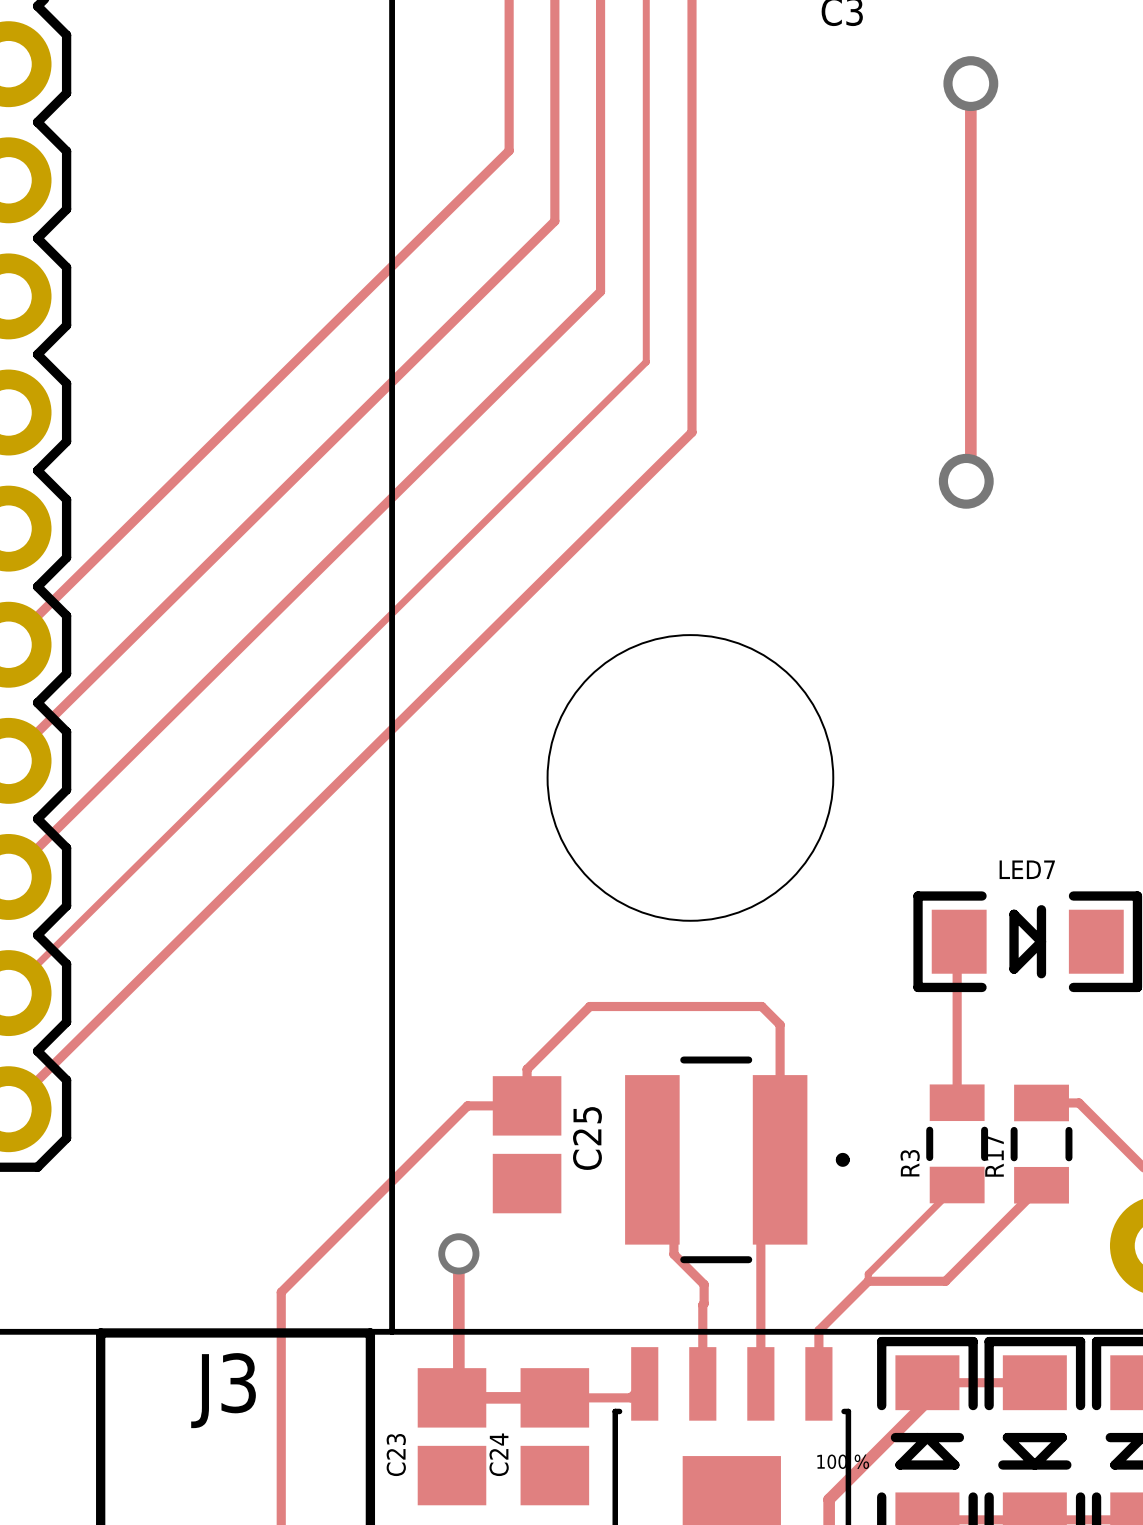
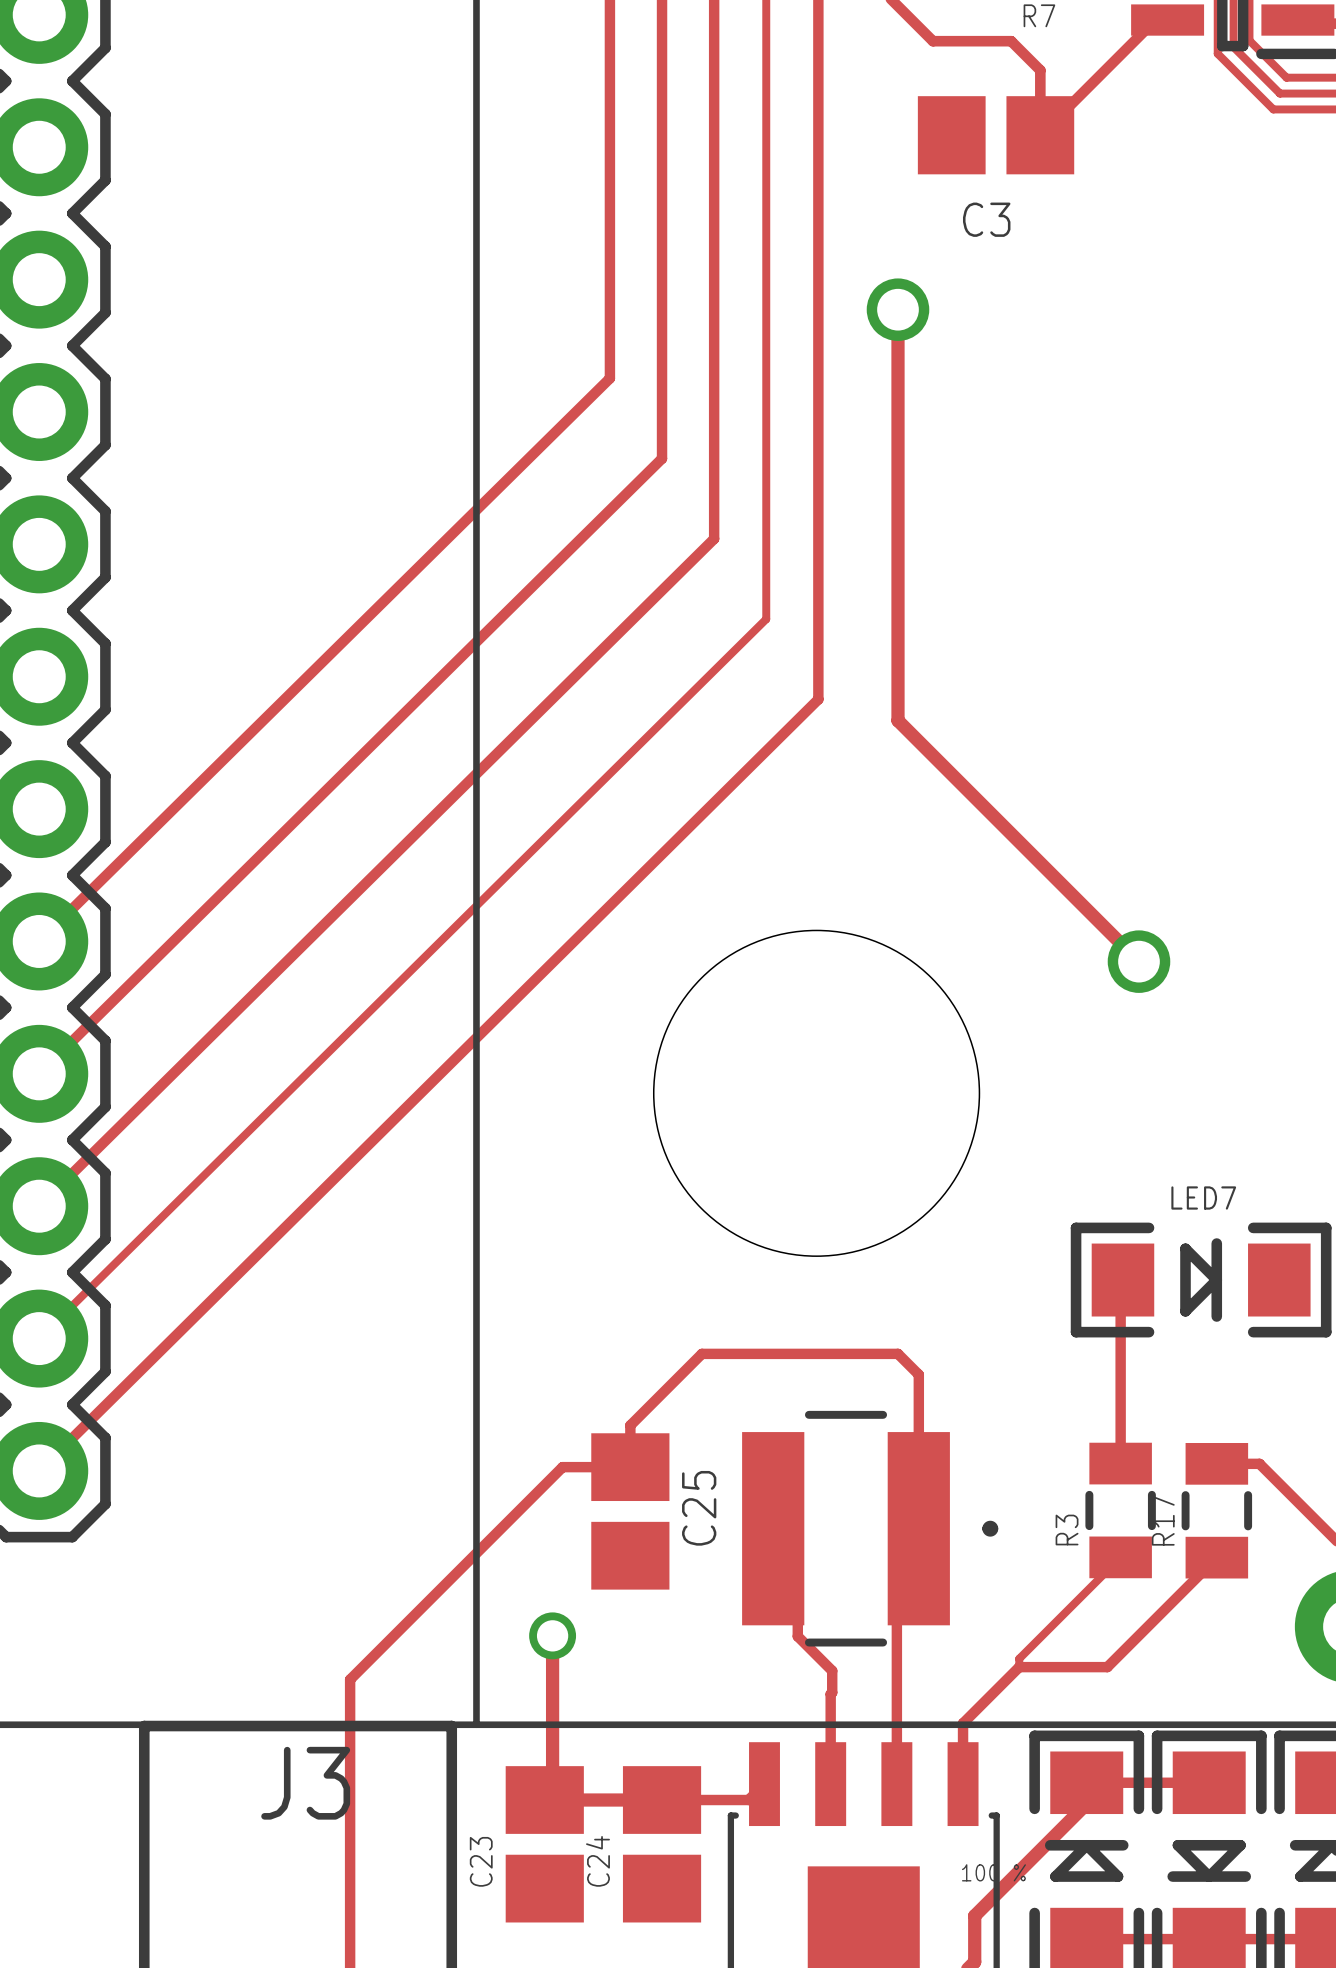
track: (970, 83) (970, 476) (966, 481) -> none
via position: (970, 83) -> (898, 309)
track: none -> (898, 309) (898, 720) (1138, 961)
via position: (966, 481) -> (1138, 961)

